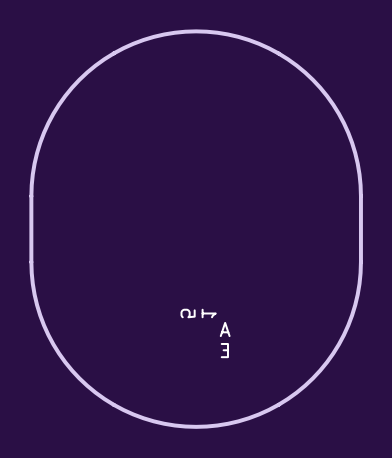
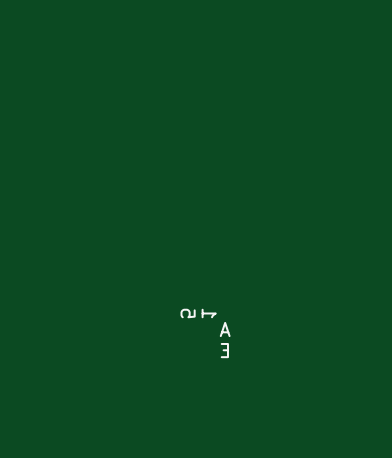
board edge: (278, 53) (305, 72) (327, 96) (343, 123) (355, 153) (360, 185) (360, 273) (357, 294) (348, 325) (333, 353) (312, 378) (287, 398) (258, 414) (228, 423) (196, 426) (164, 423) (133, 414) (104, 398) (79, 378) (59, 353) (40, 315) (31, 273) (31, 196) (34, 163) (43, 132) (65, 96) (87, 72) (113, 53) (143, 39) (174, 32) (217, 32) (248, 39) (278, 53) -> none

